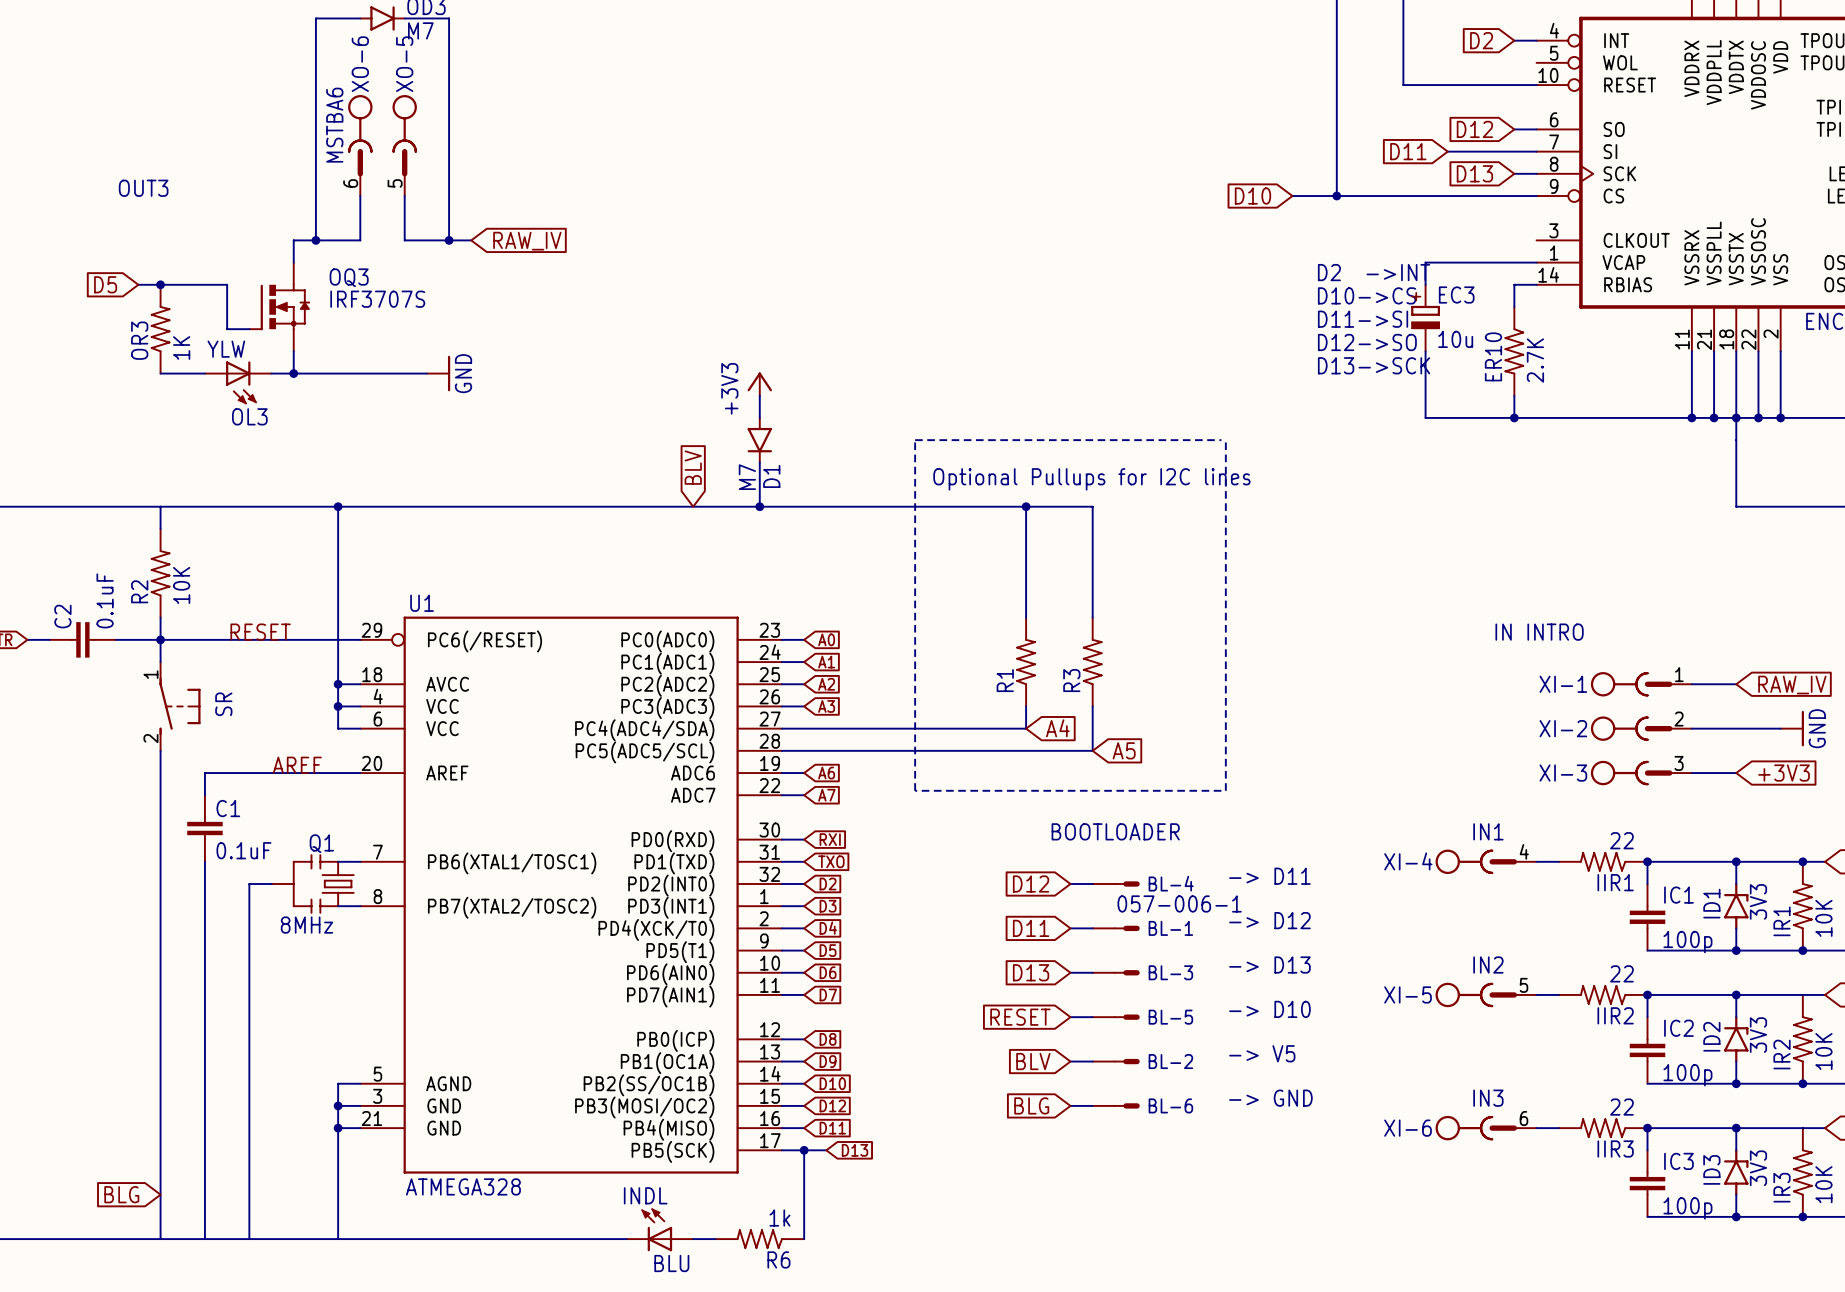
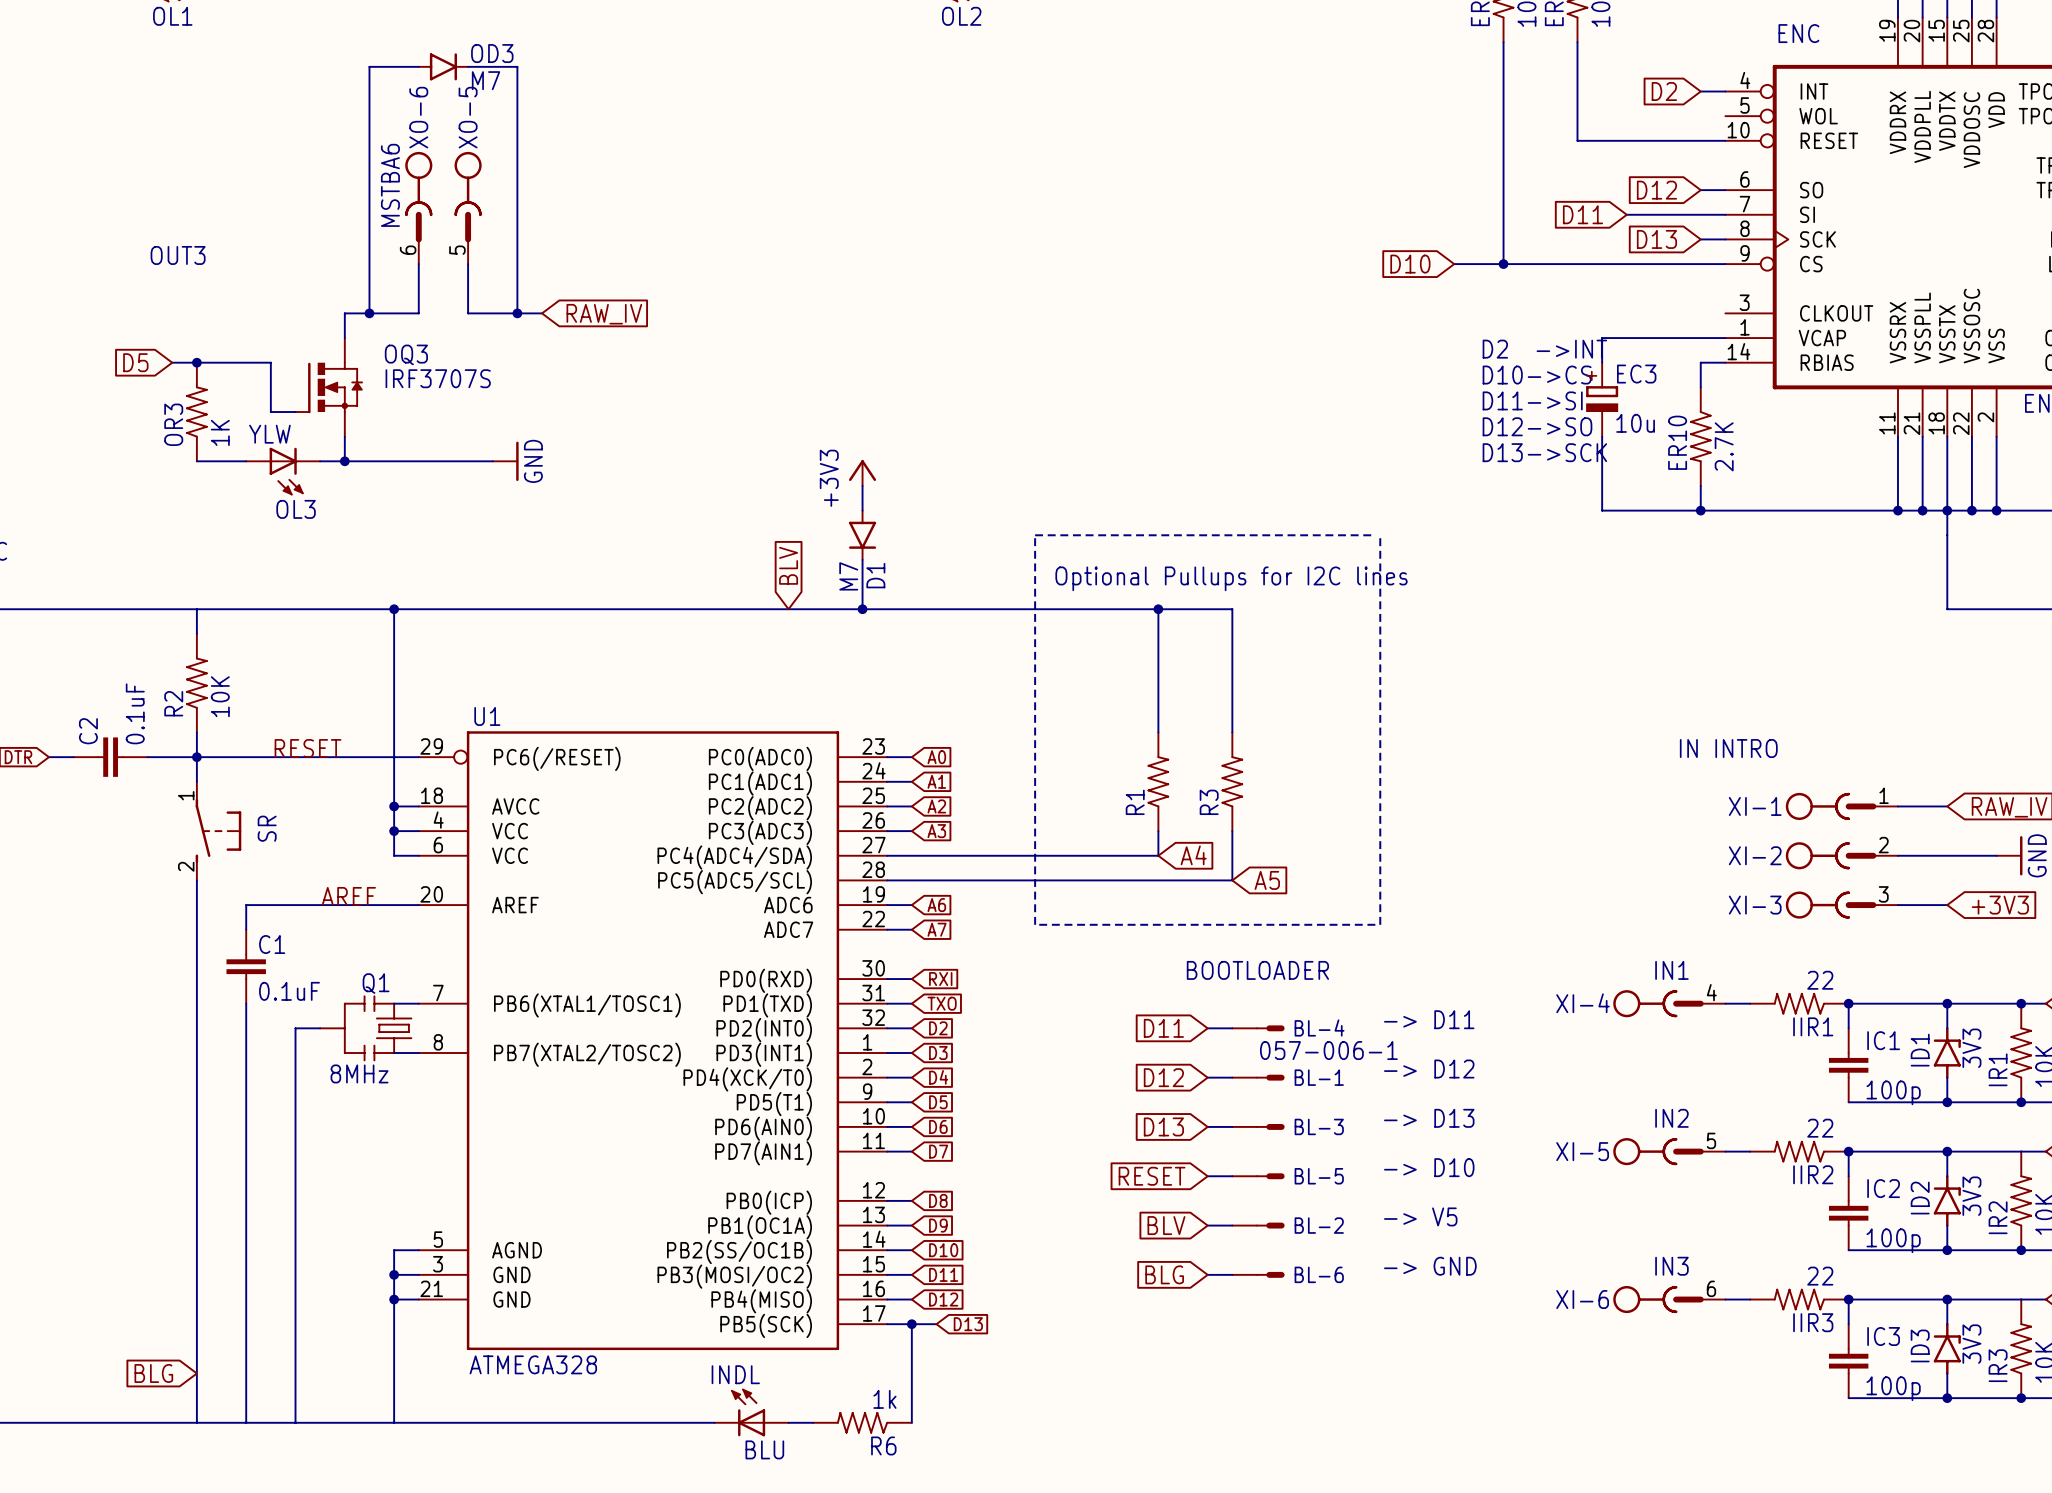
global label: D12 (1031, 884) -> D11 (1163, 1028)
global label: D11 (1031, 928) -> D12 (1163, 1077)
global label: D12 (832, 1105) -> D11 (943, 1274)
global label: D11 (832, 1128) -> D12 (943, 1299)

